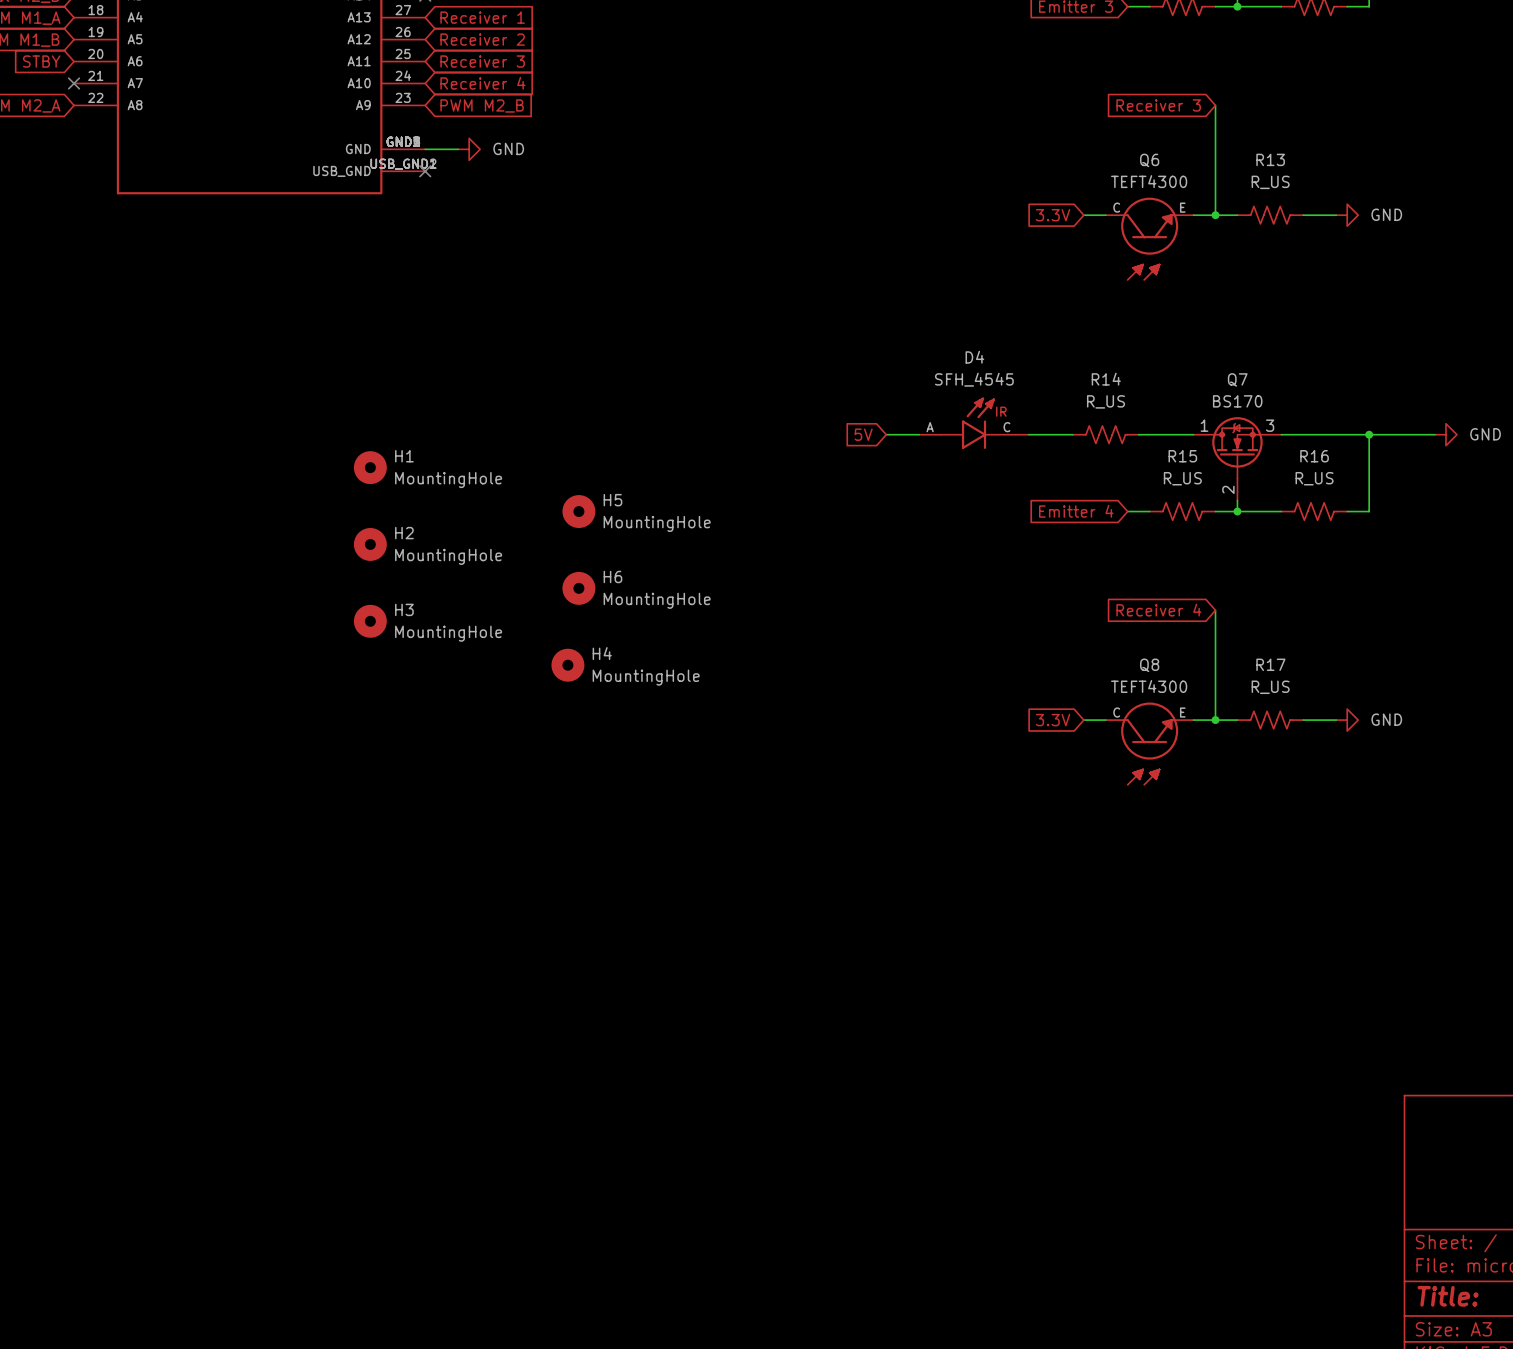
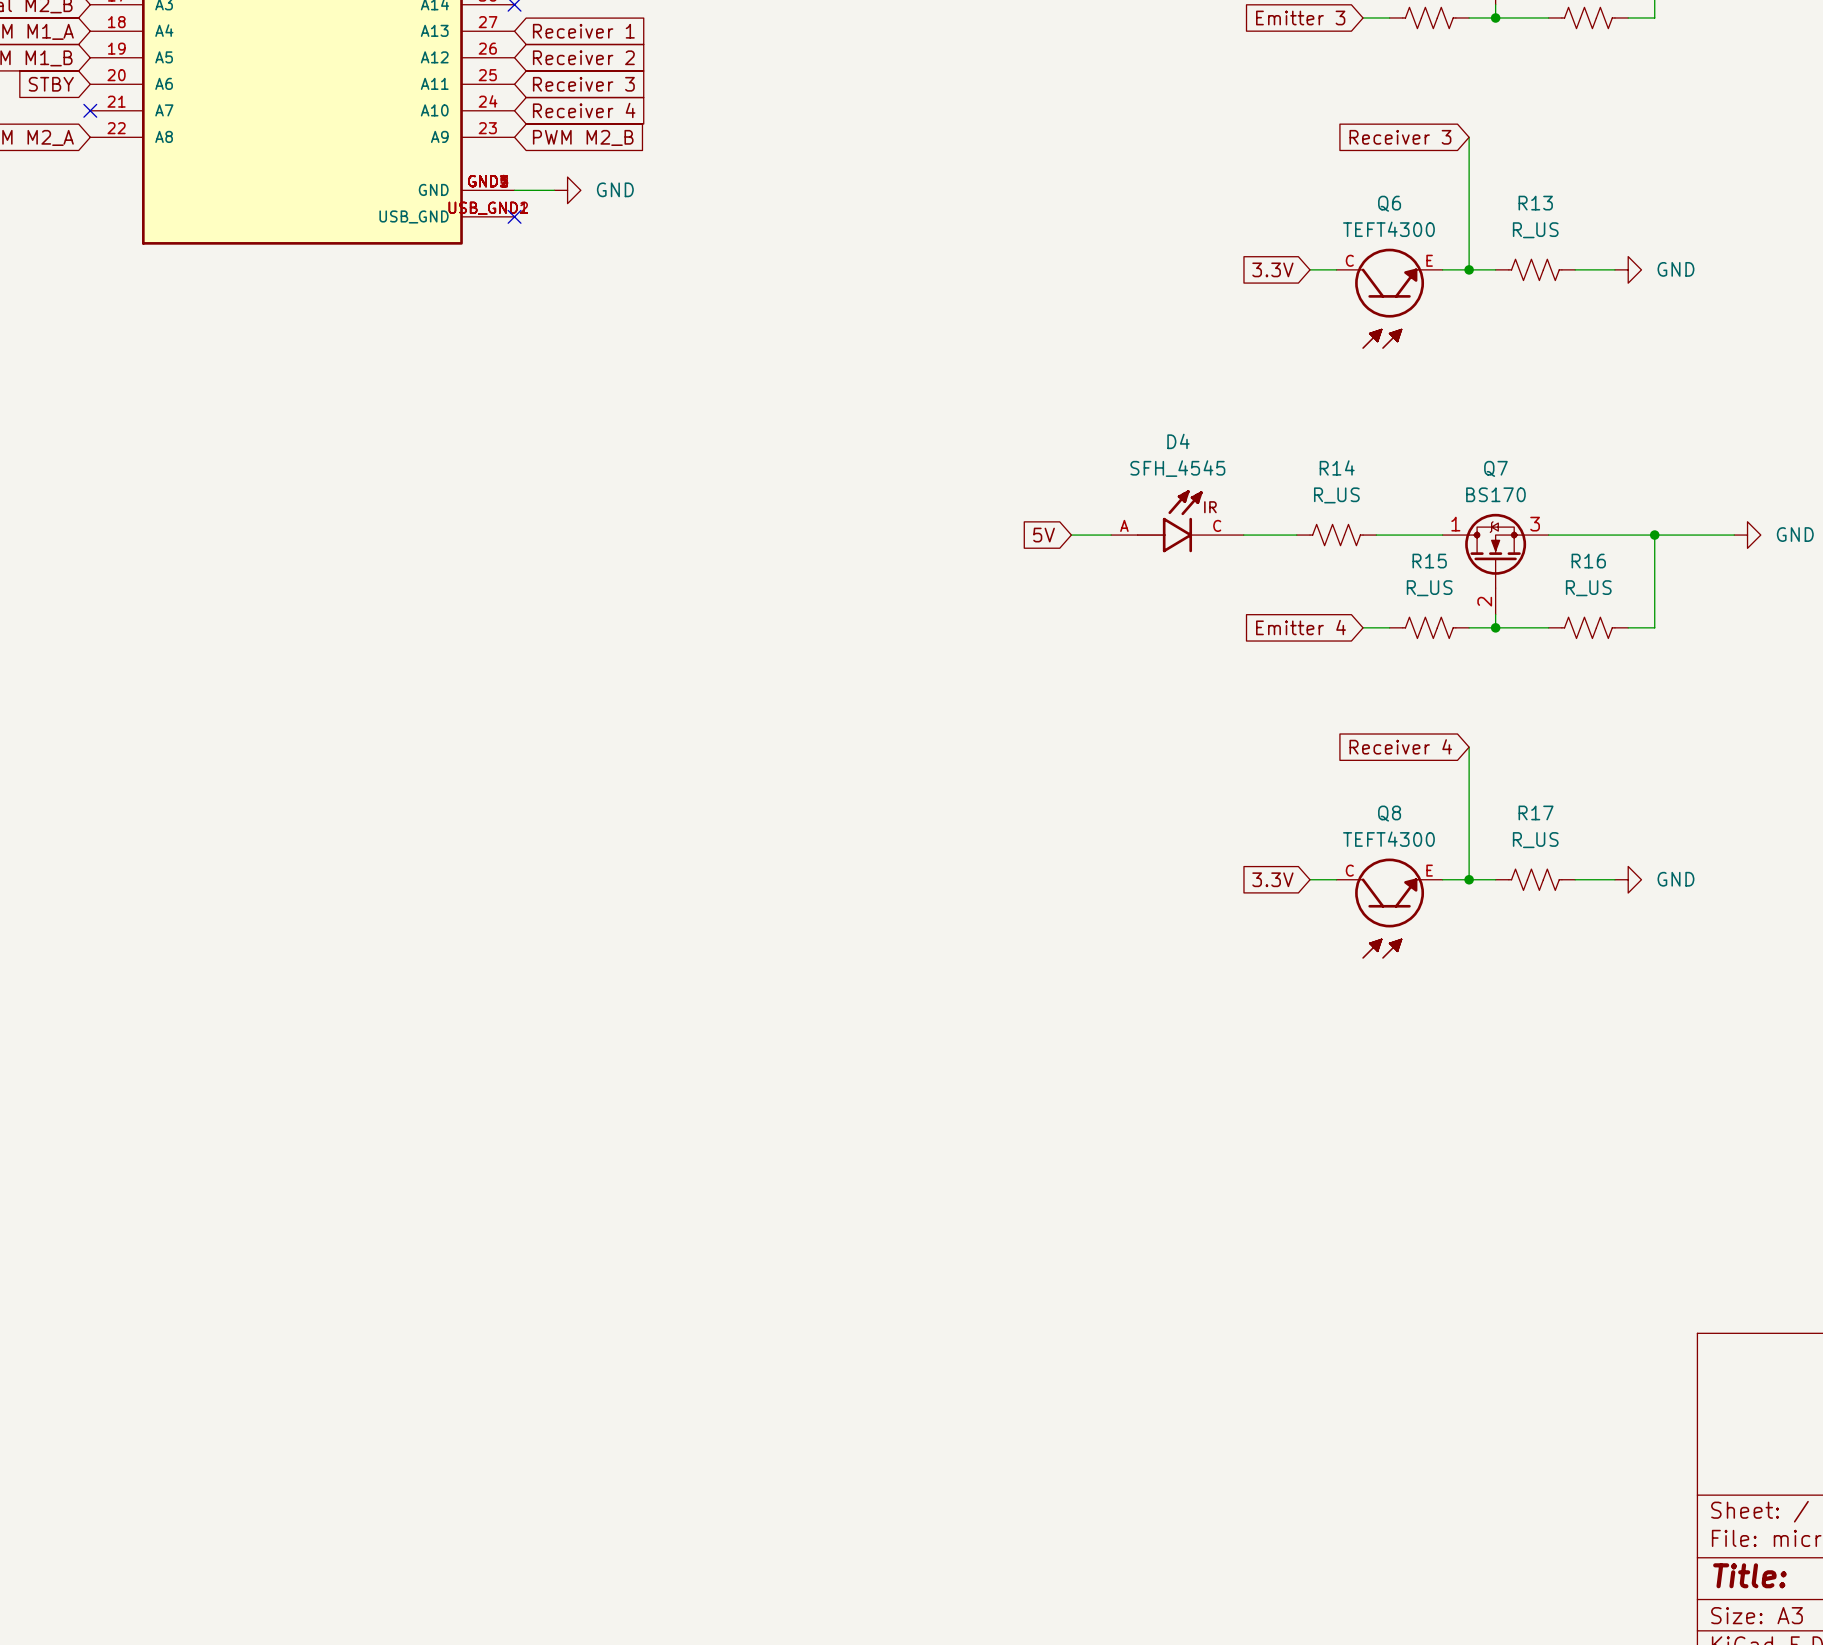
H1: MountingHole (370, 467) -> none
H5: MountingHole (578, 511) -> none
H2: MountingHole (370, 544) -> none
H6: MountingHole (578, 588) -> none
H3: MountingHole (370, 621) -> none
H4: MountingHole (567, 665) -> none

